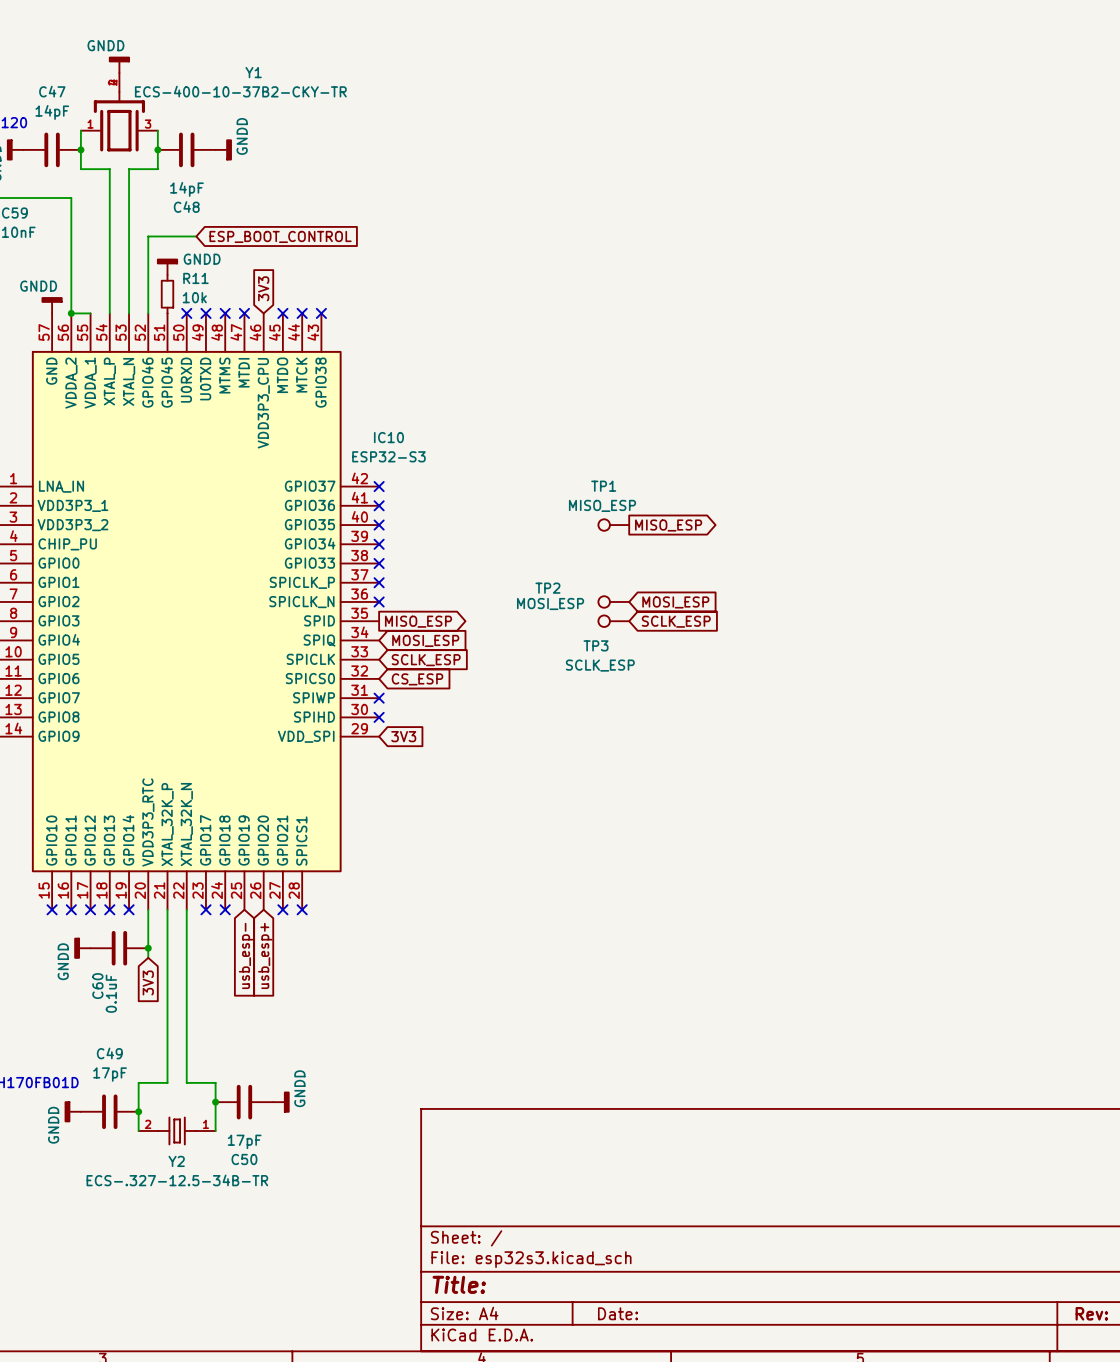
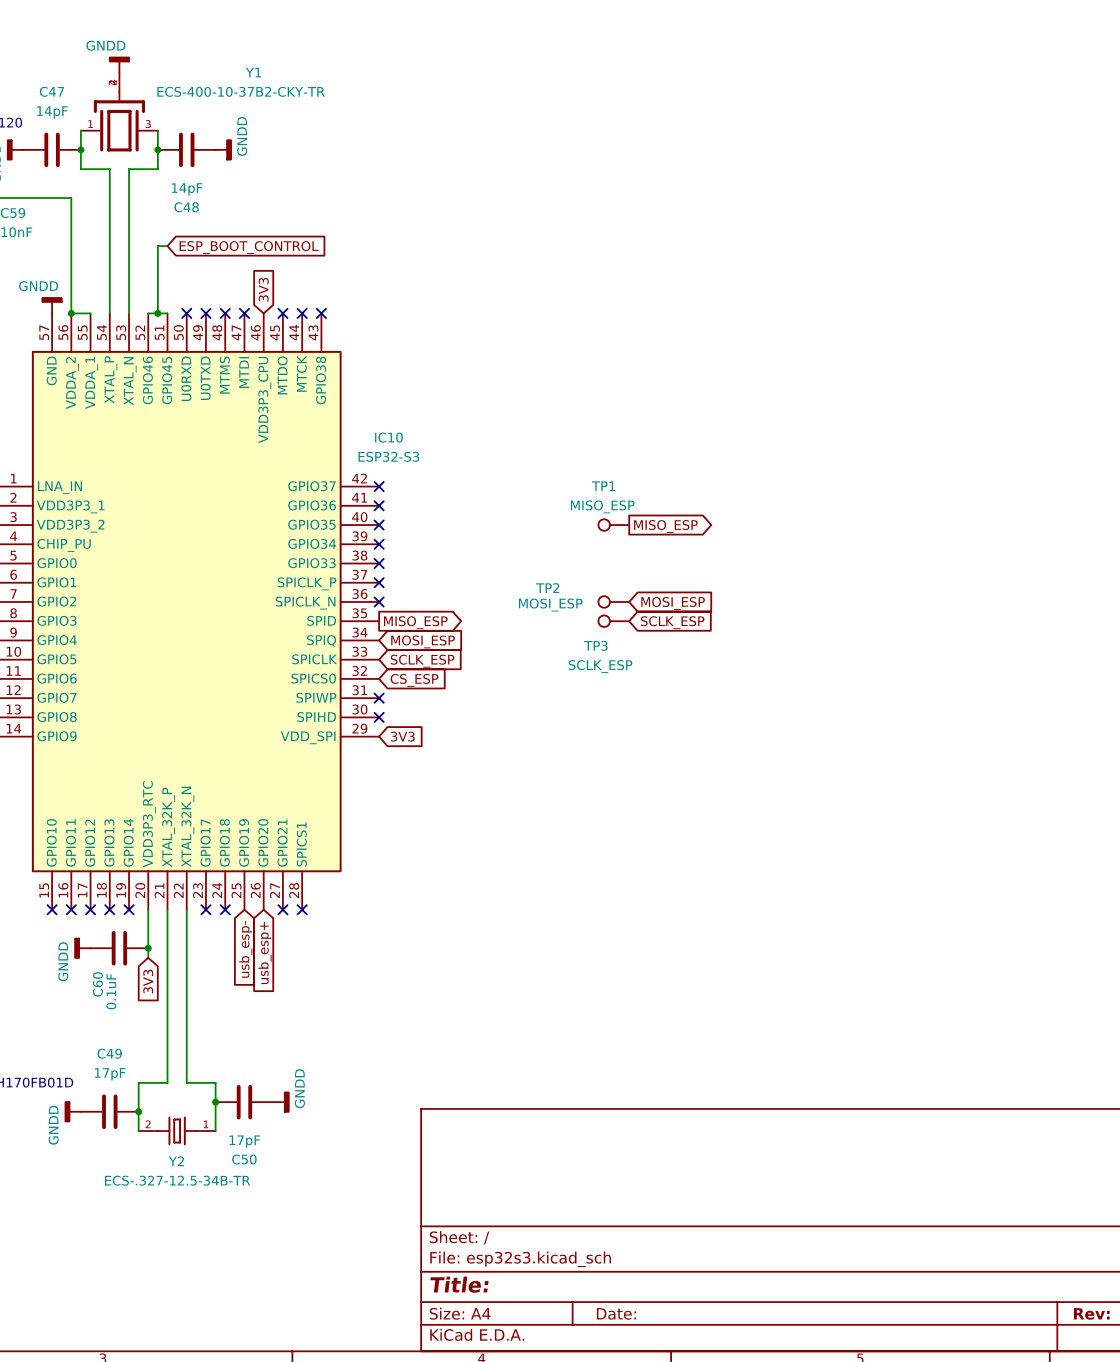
wire: (196, 236) (148, 236) (148, 313) -> (167, 313) (148, 313)
global label position: ESP_BOOT_CONTROL (280, 236) -> ESP_BOOT_CONTROL (249, 247)
wire: none -> (167, 246) (157, 246) (157, 313)
power symbol: GNDD (167, 266) -> none
R11: 10k (167, 294) -> none
junction: none -> (157, 313)

